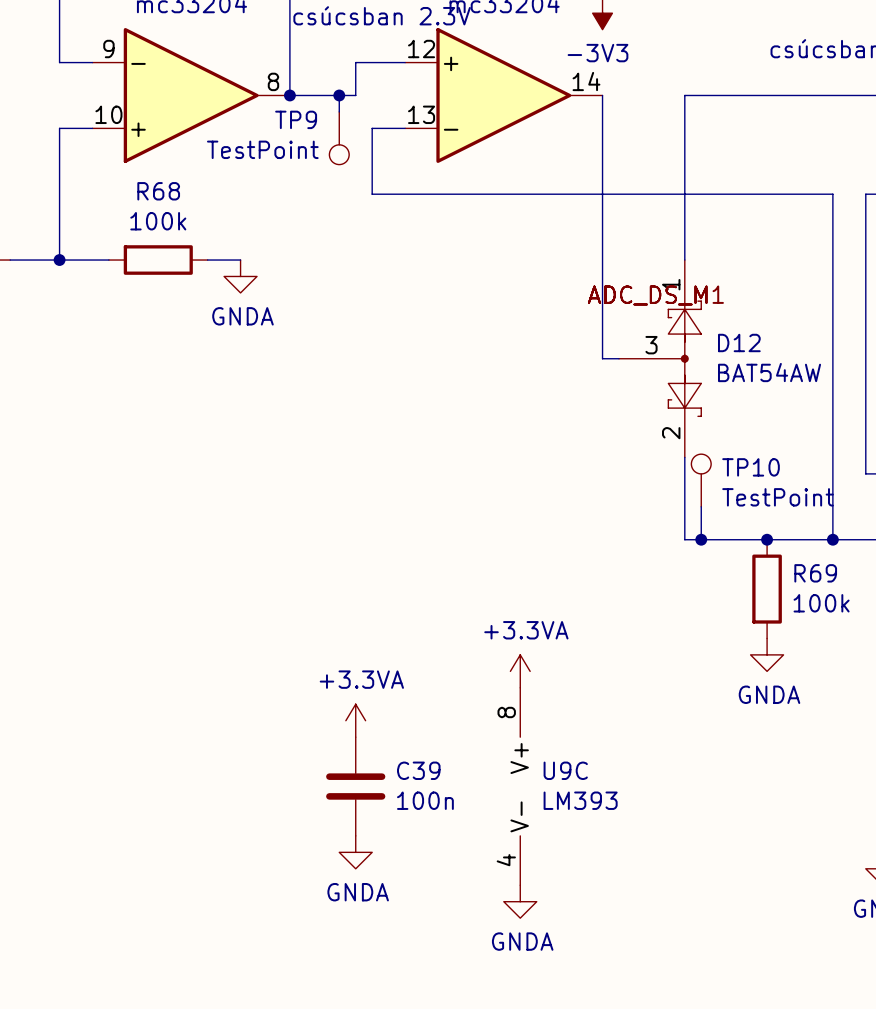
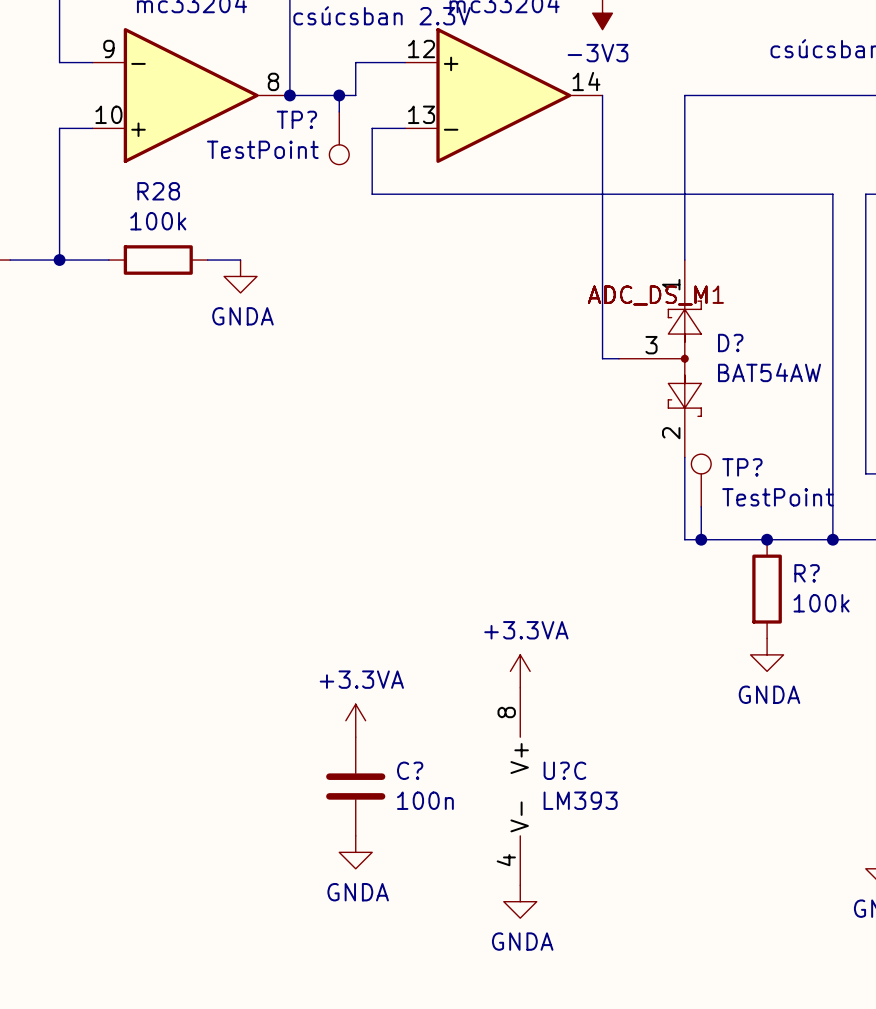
TP9 name: TP9 (296, 119) -> TP? (296, 119)
R68 name: R68 (158, 191) -> R28 (158, 191)
D12 name: D12 (739, 342) -> D? (730, 342)
TP10 name: TP10 (751, 467) -> TP? (742, 467)
R69 name: R69 (815, 573) -> R? (807, 573)
C39 name: C39 (418, 770) -> C? (410, 770)
U9C name: U9C (565, 770) -> U?C (564, 770)

